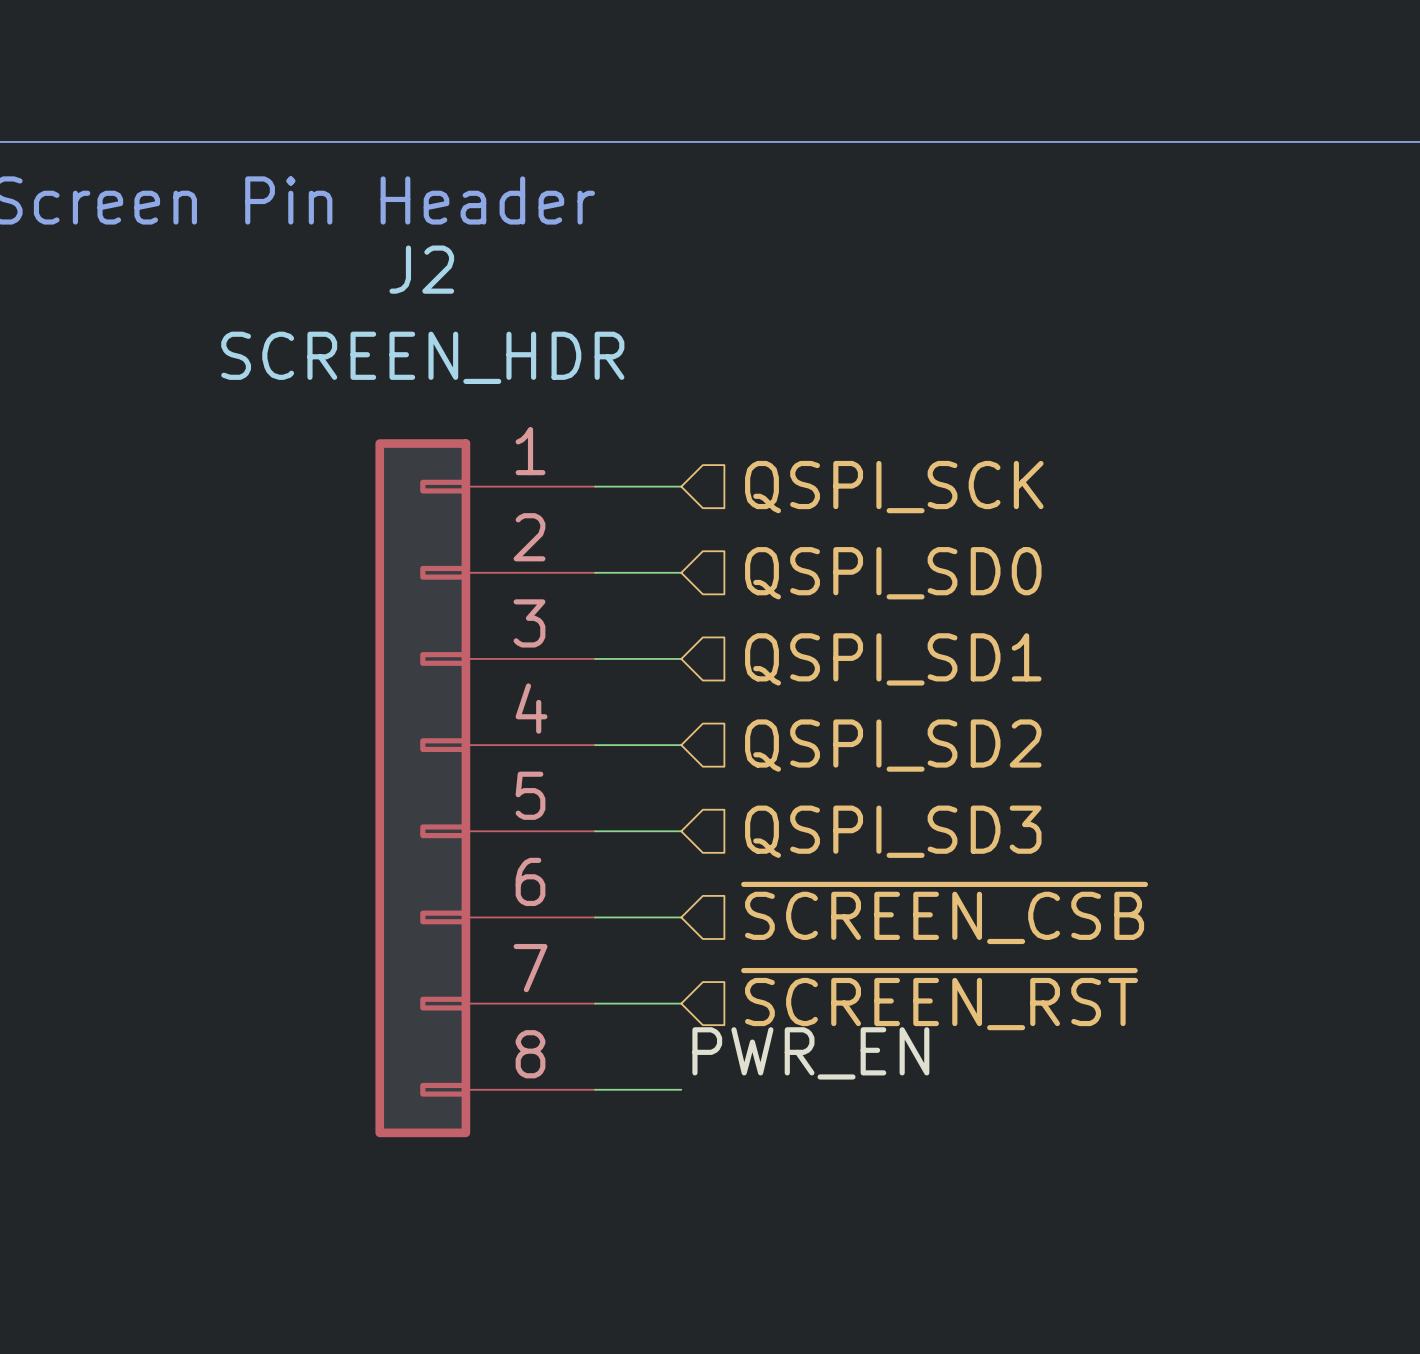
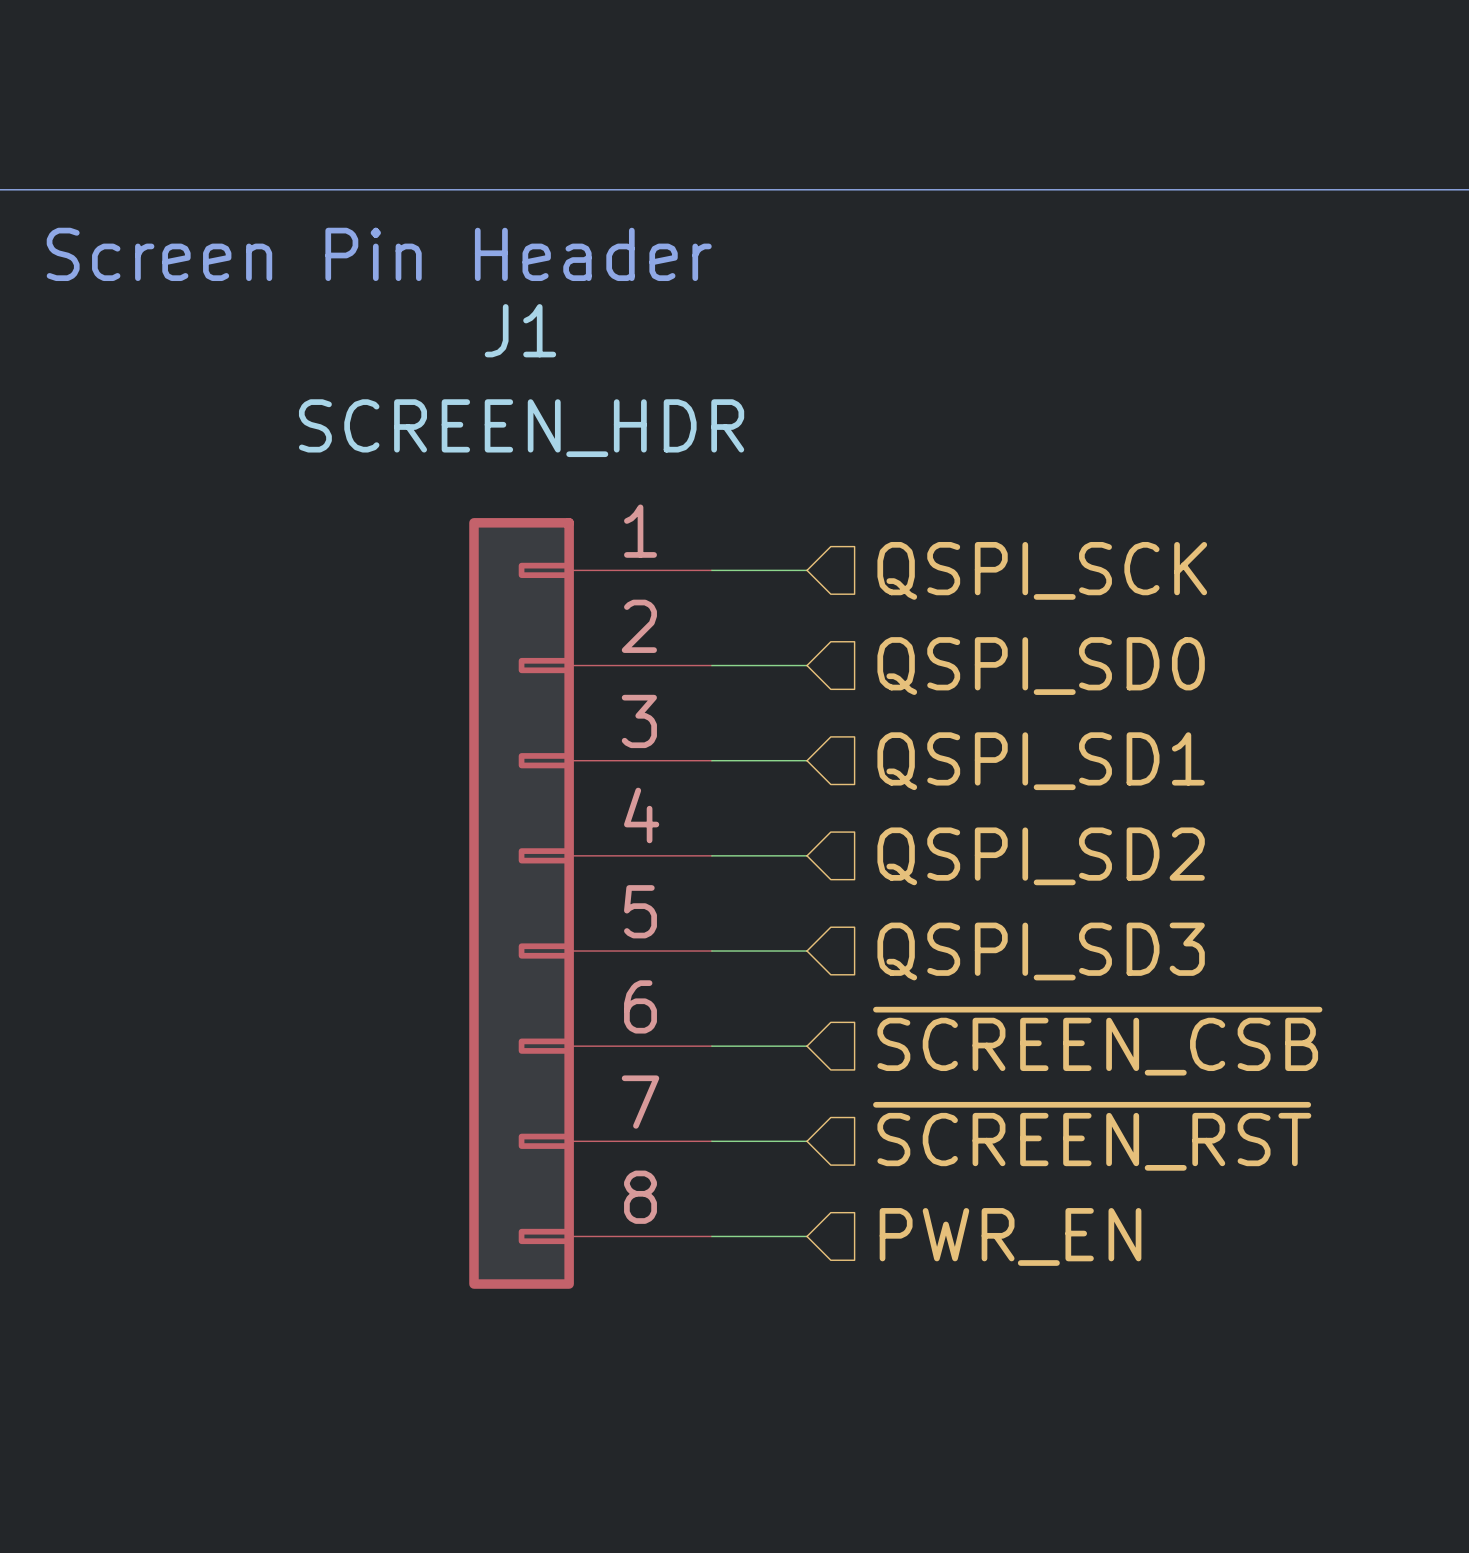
J2 name: J2 (421, 269) -> J1 (520, 330)
label: PWR_EN (810, 1053) -> none
hierarchical label: none -> PWR_EN (1010, 1236)

